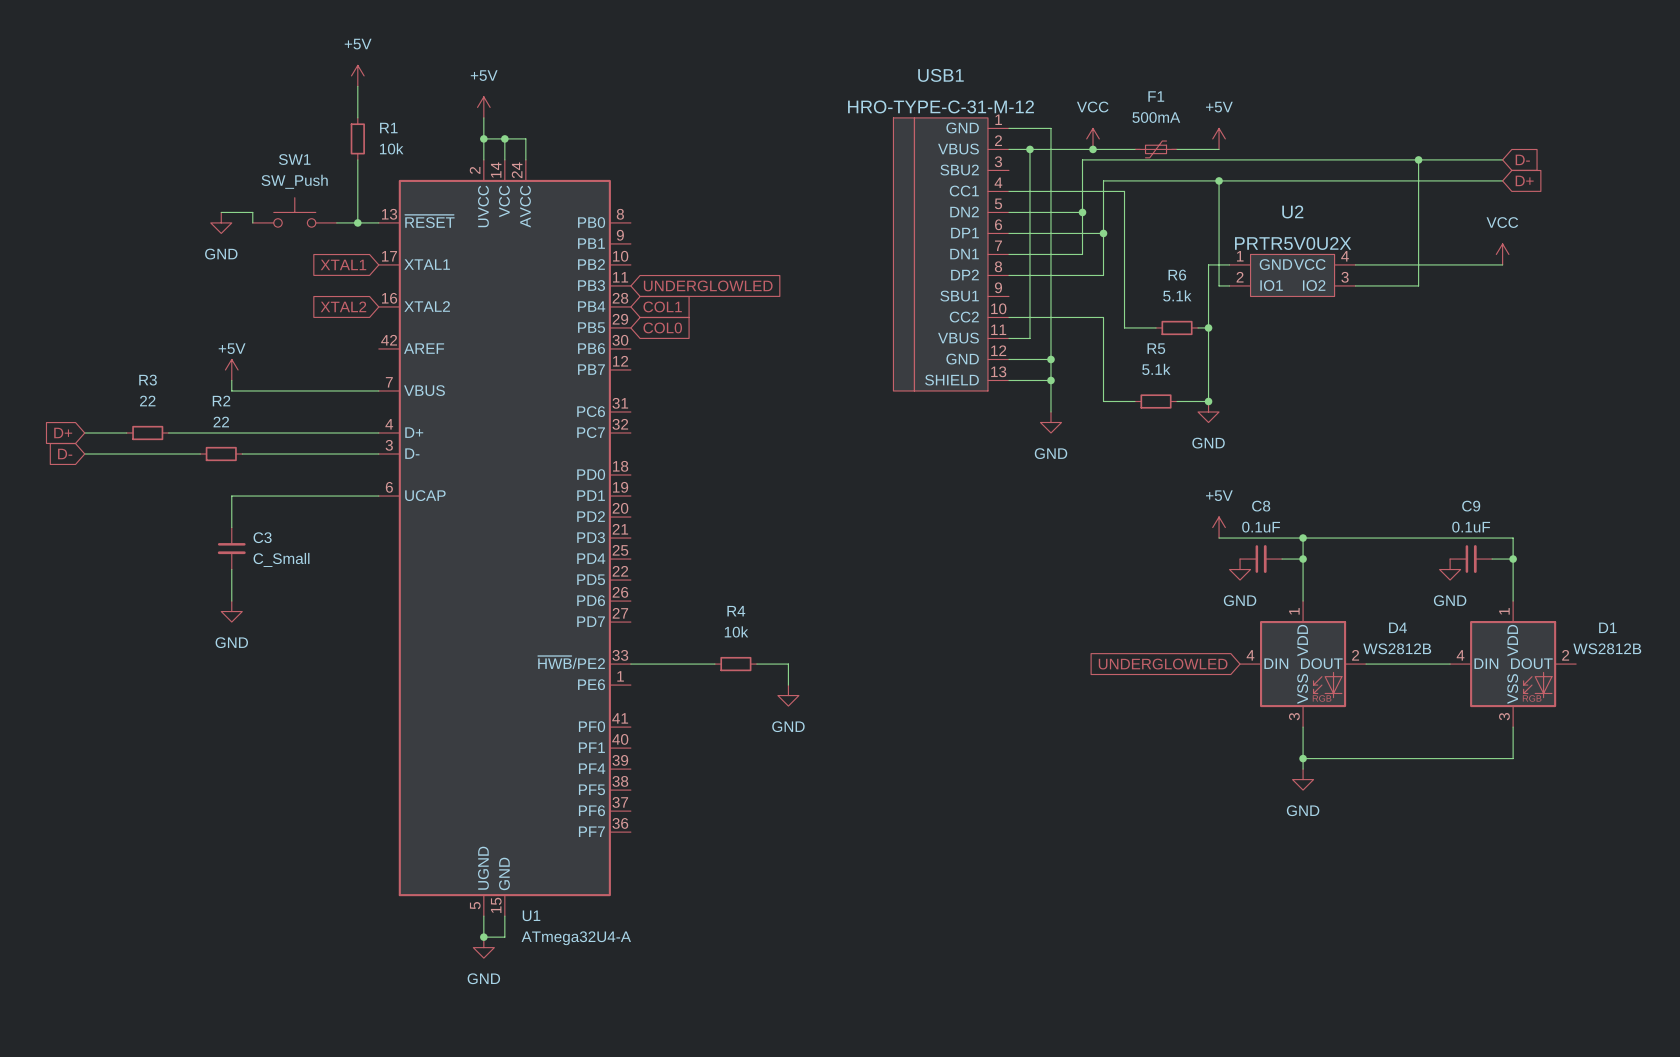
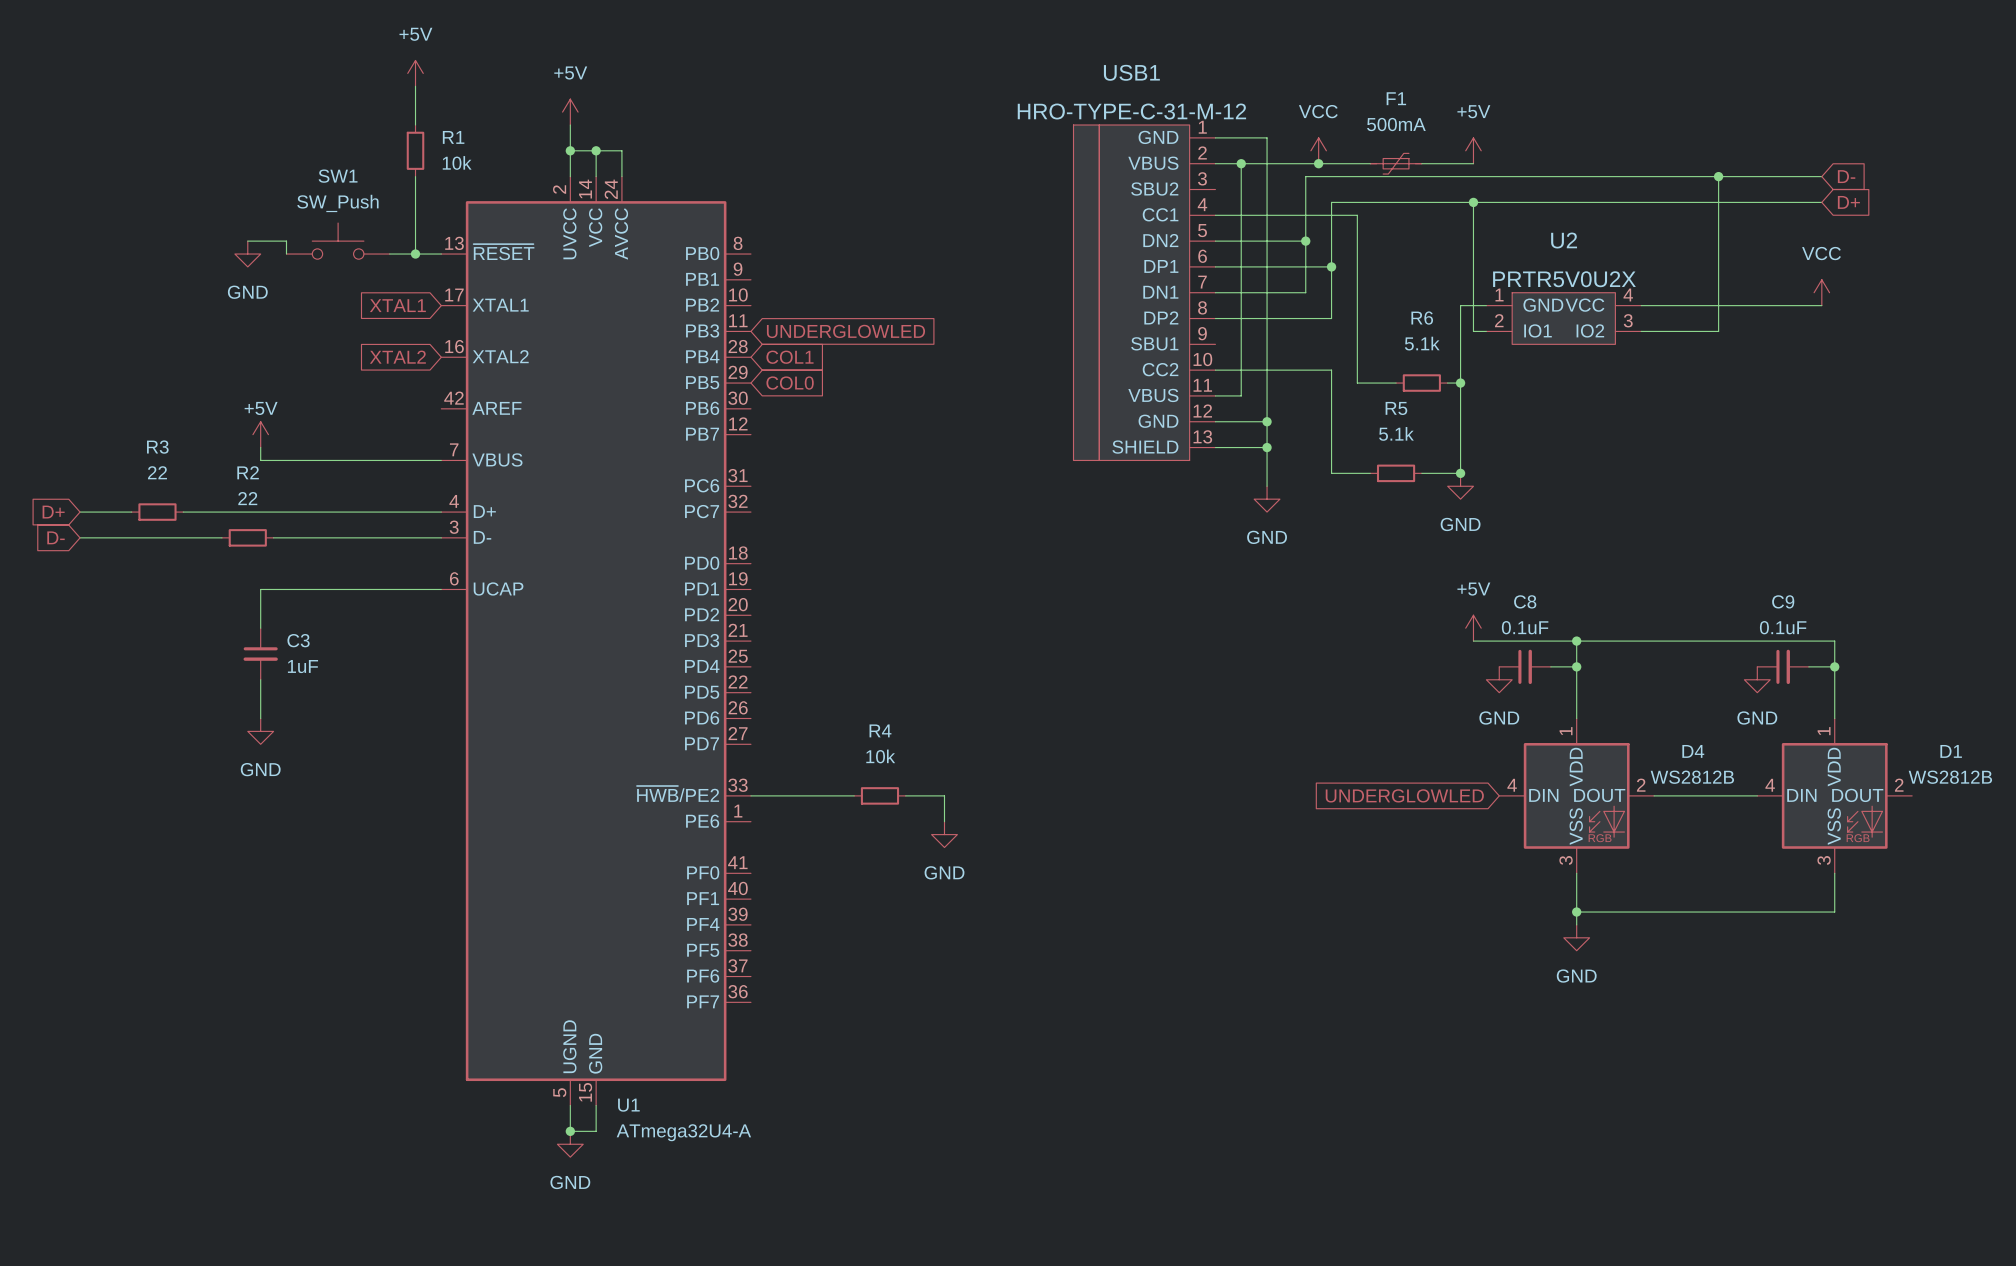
C3 value: C_Small (281, 559) -> 1uF (302, 666)

